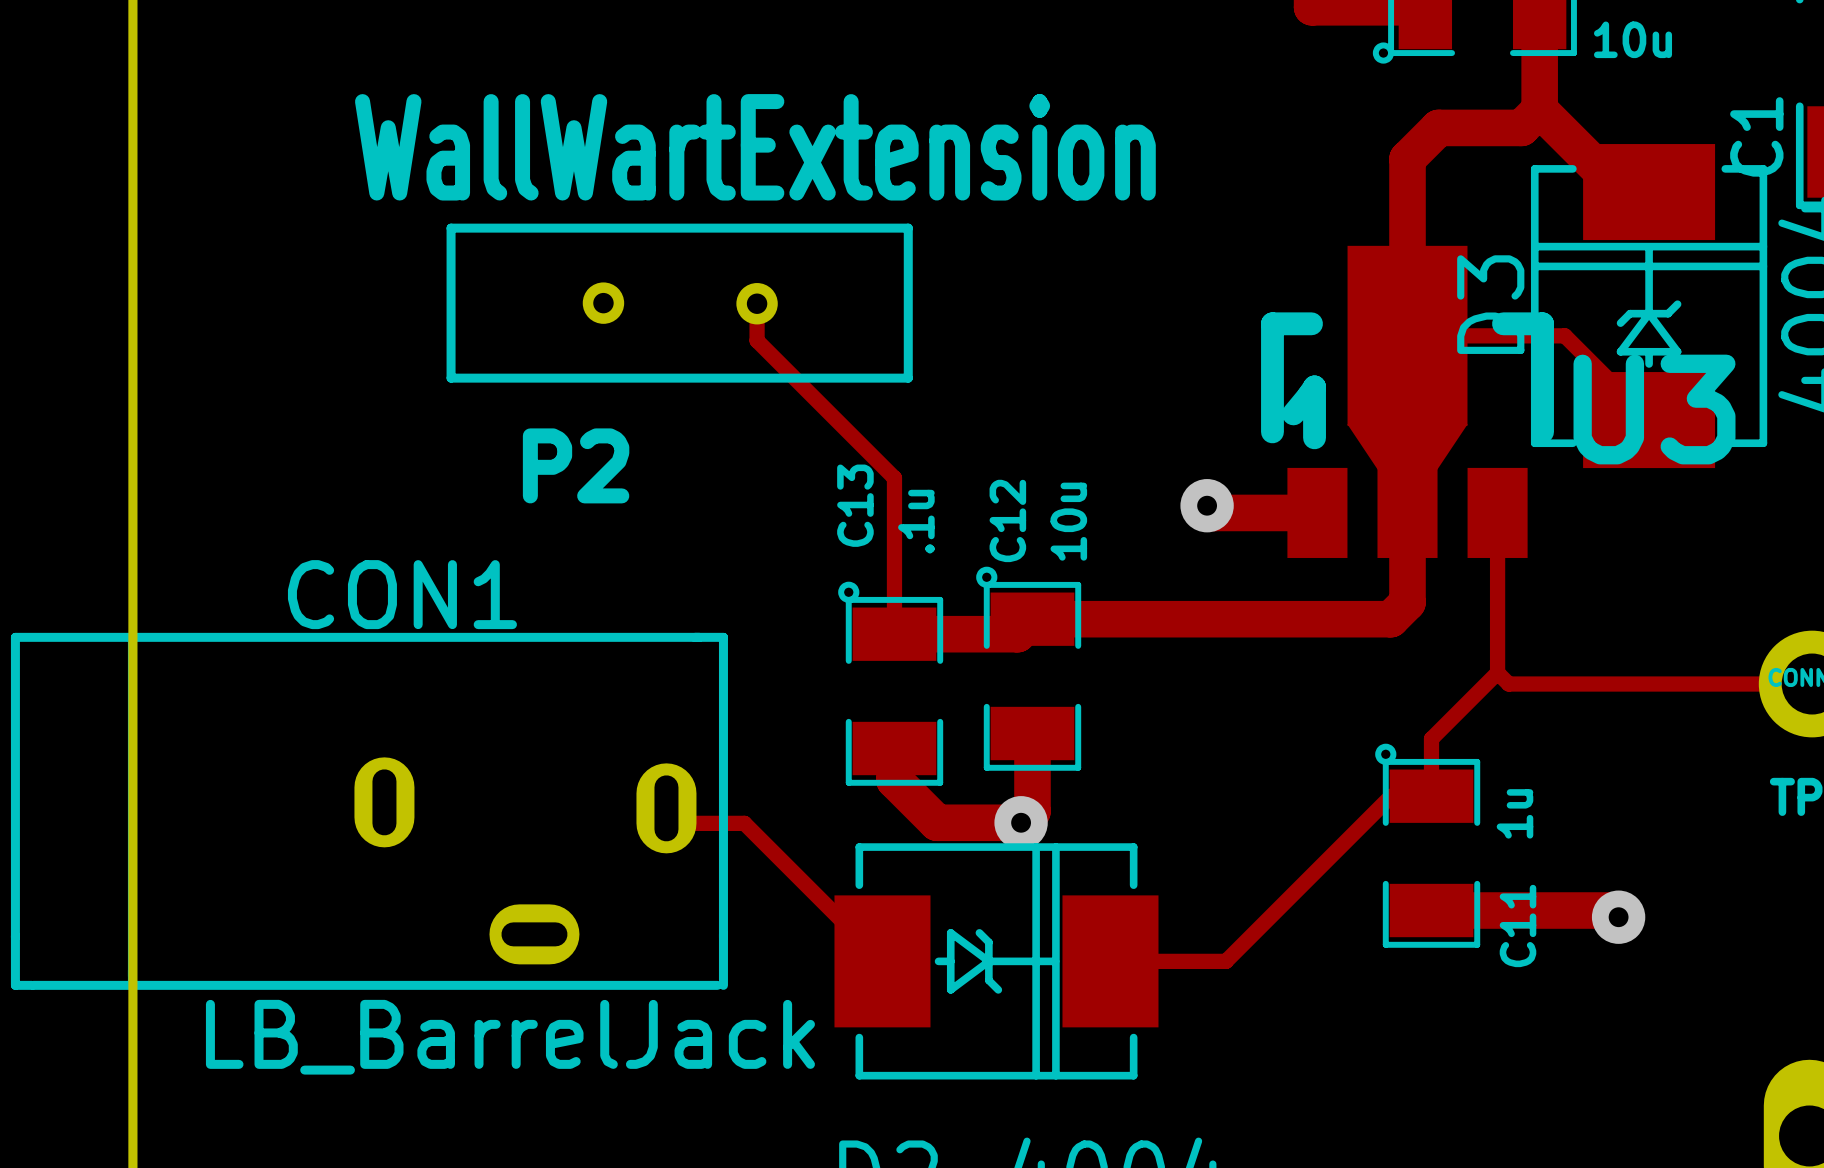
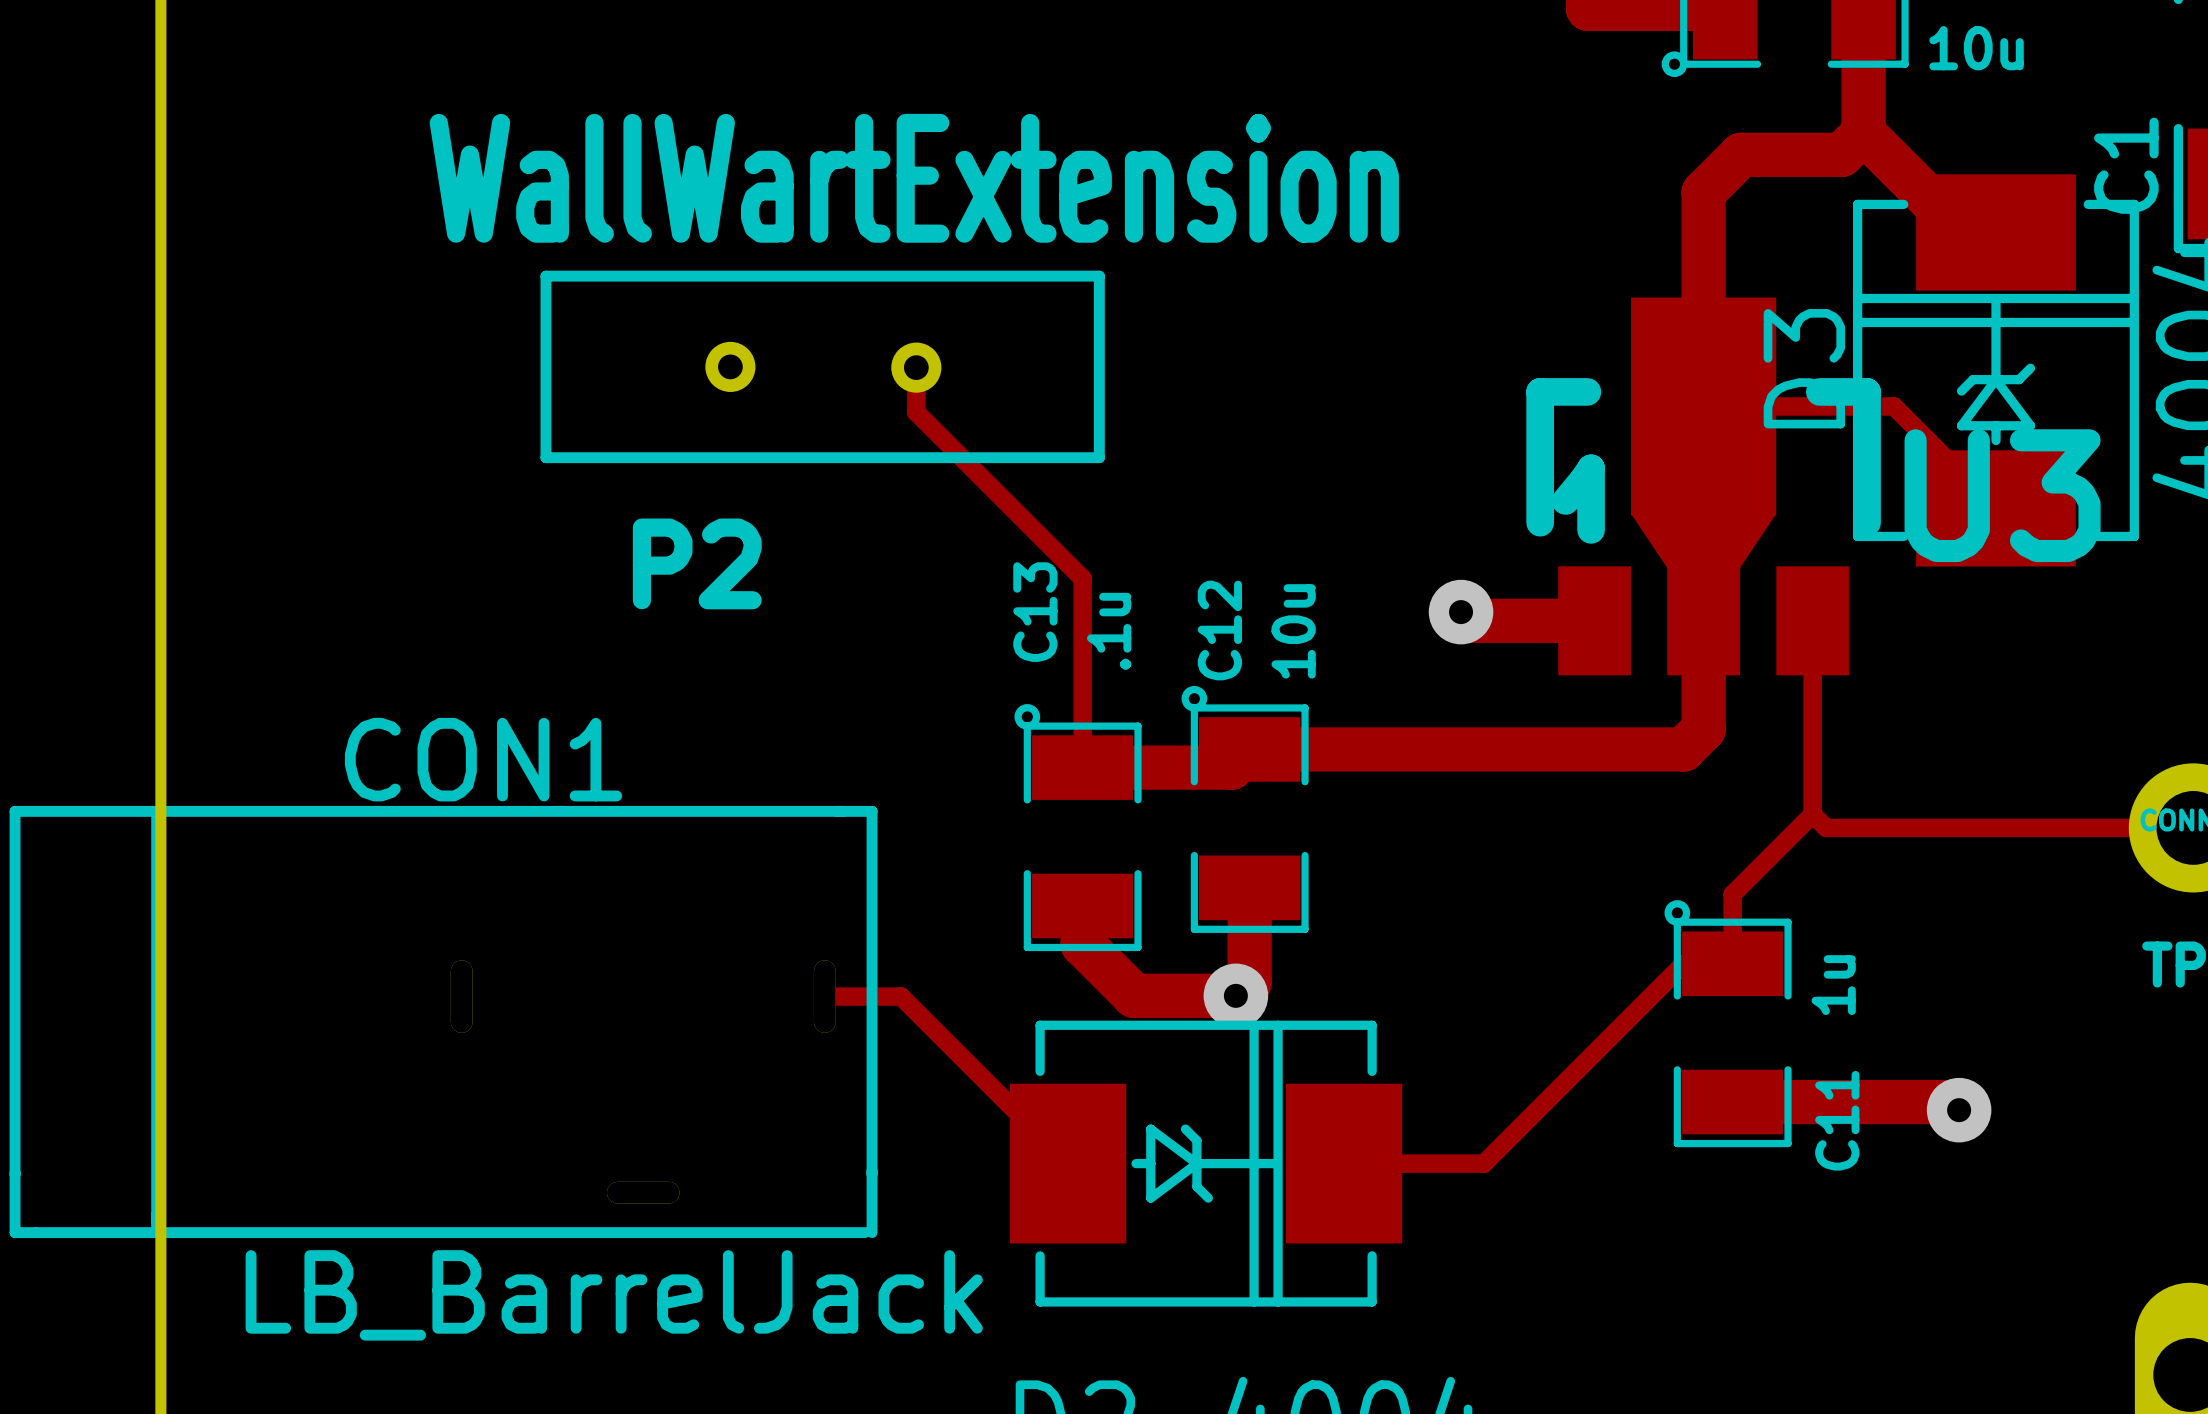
CON1 name position: CON1 (402, 594) -> CON1 (483, 759)
CON1 footprint: [10, 632, 728, 990] -> [9, 805, 878, 1239]
CON1 value position: LB_BarrelJack (510, 1037) -> LB_BarrelJack (614, 1295)

